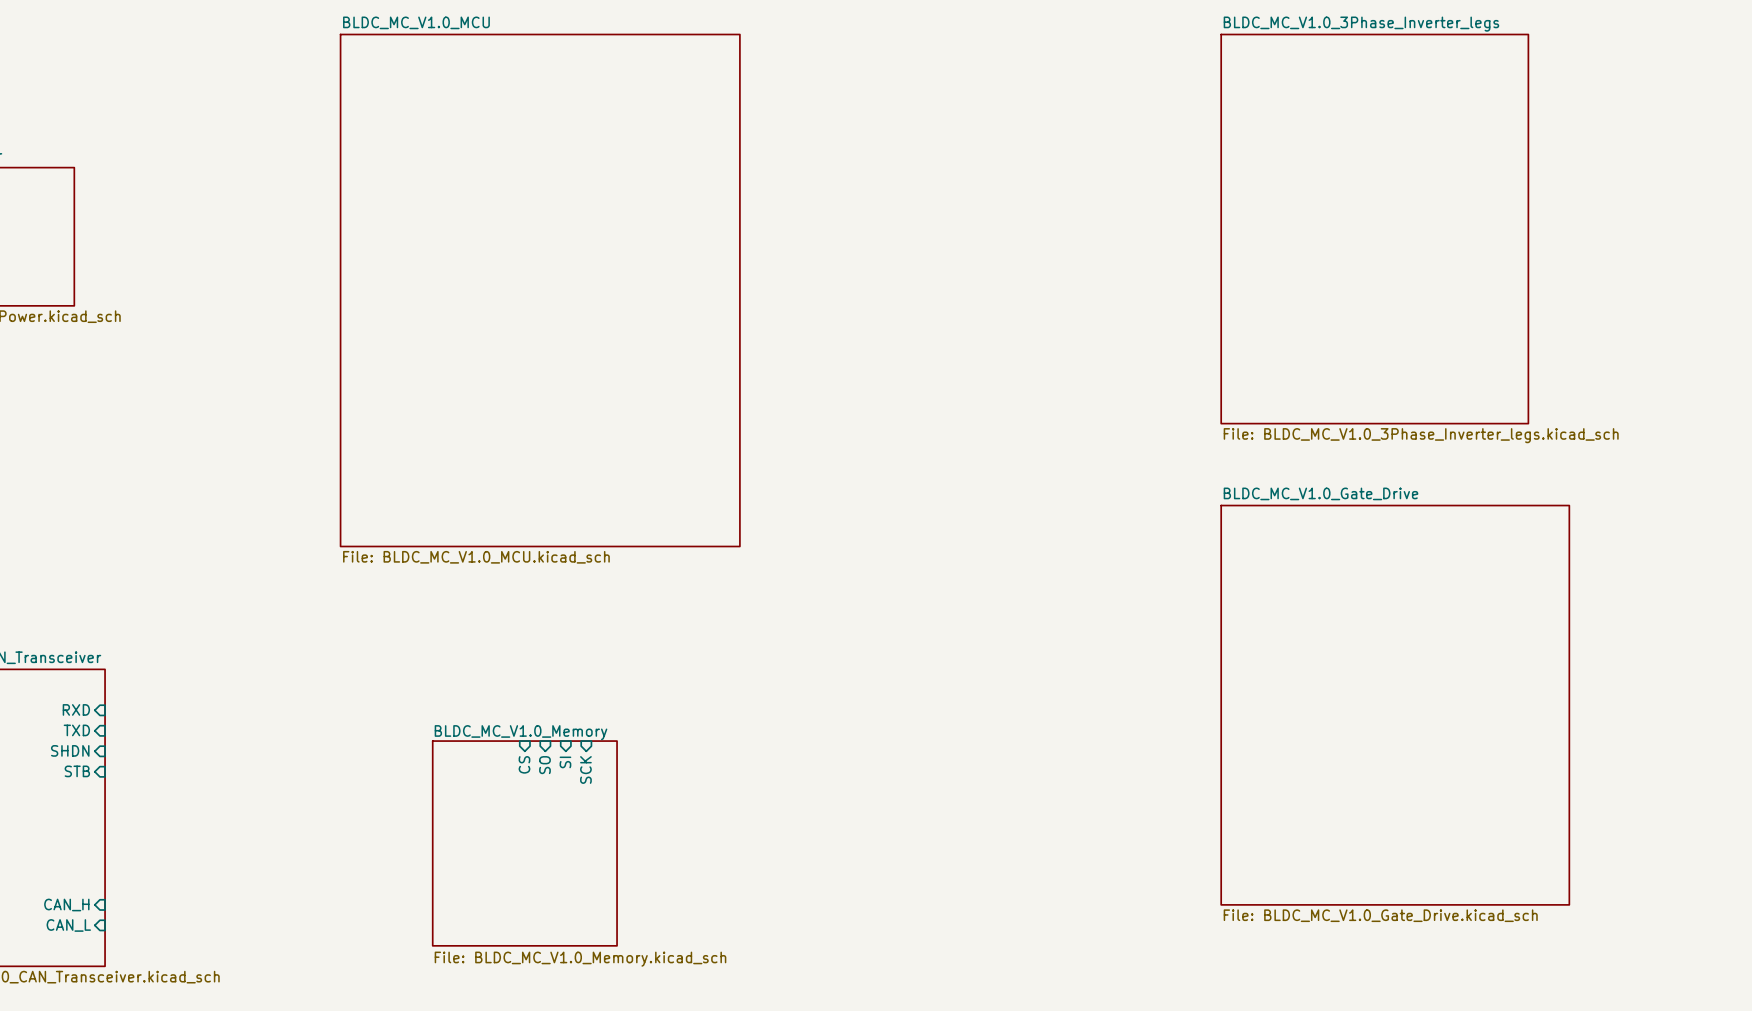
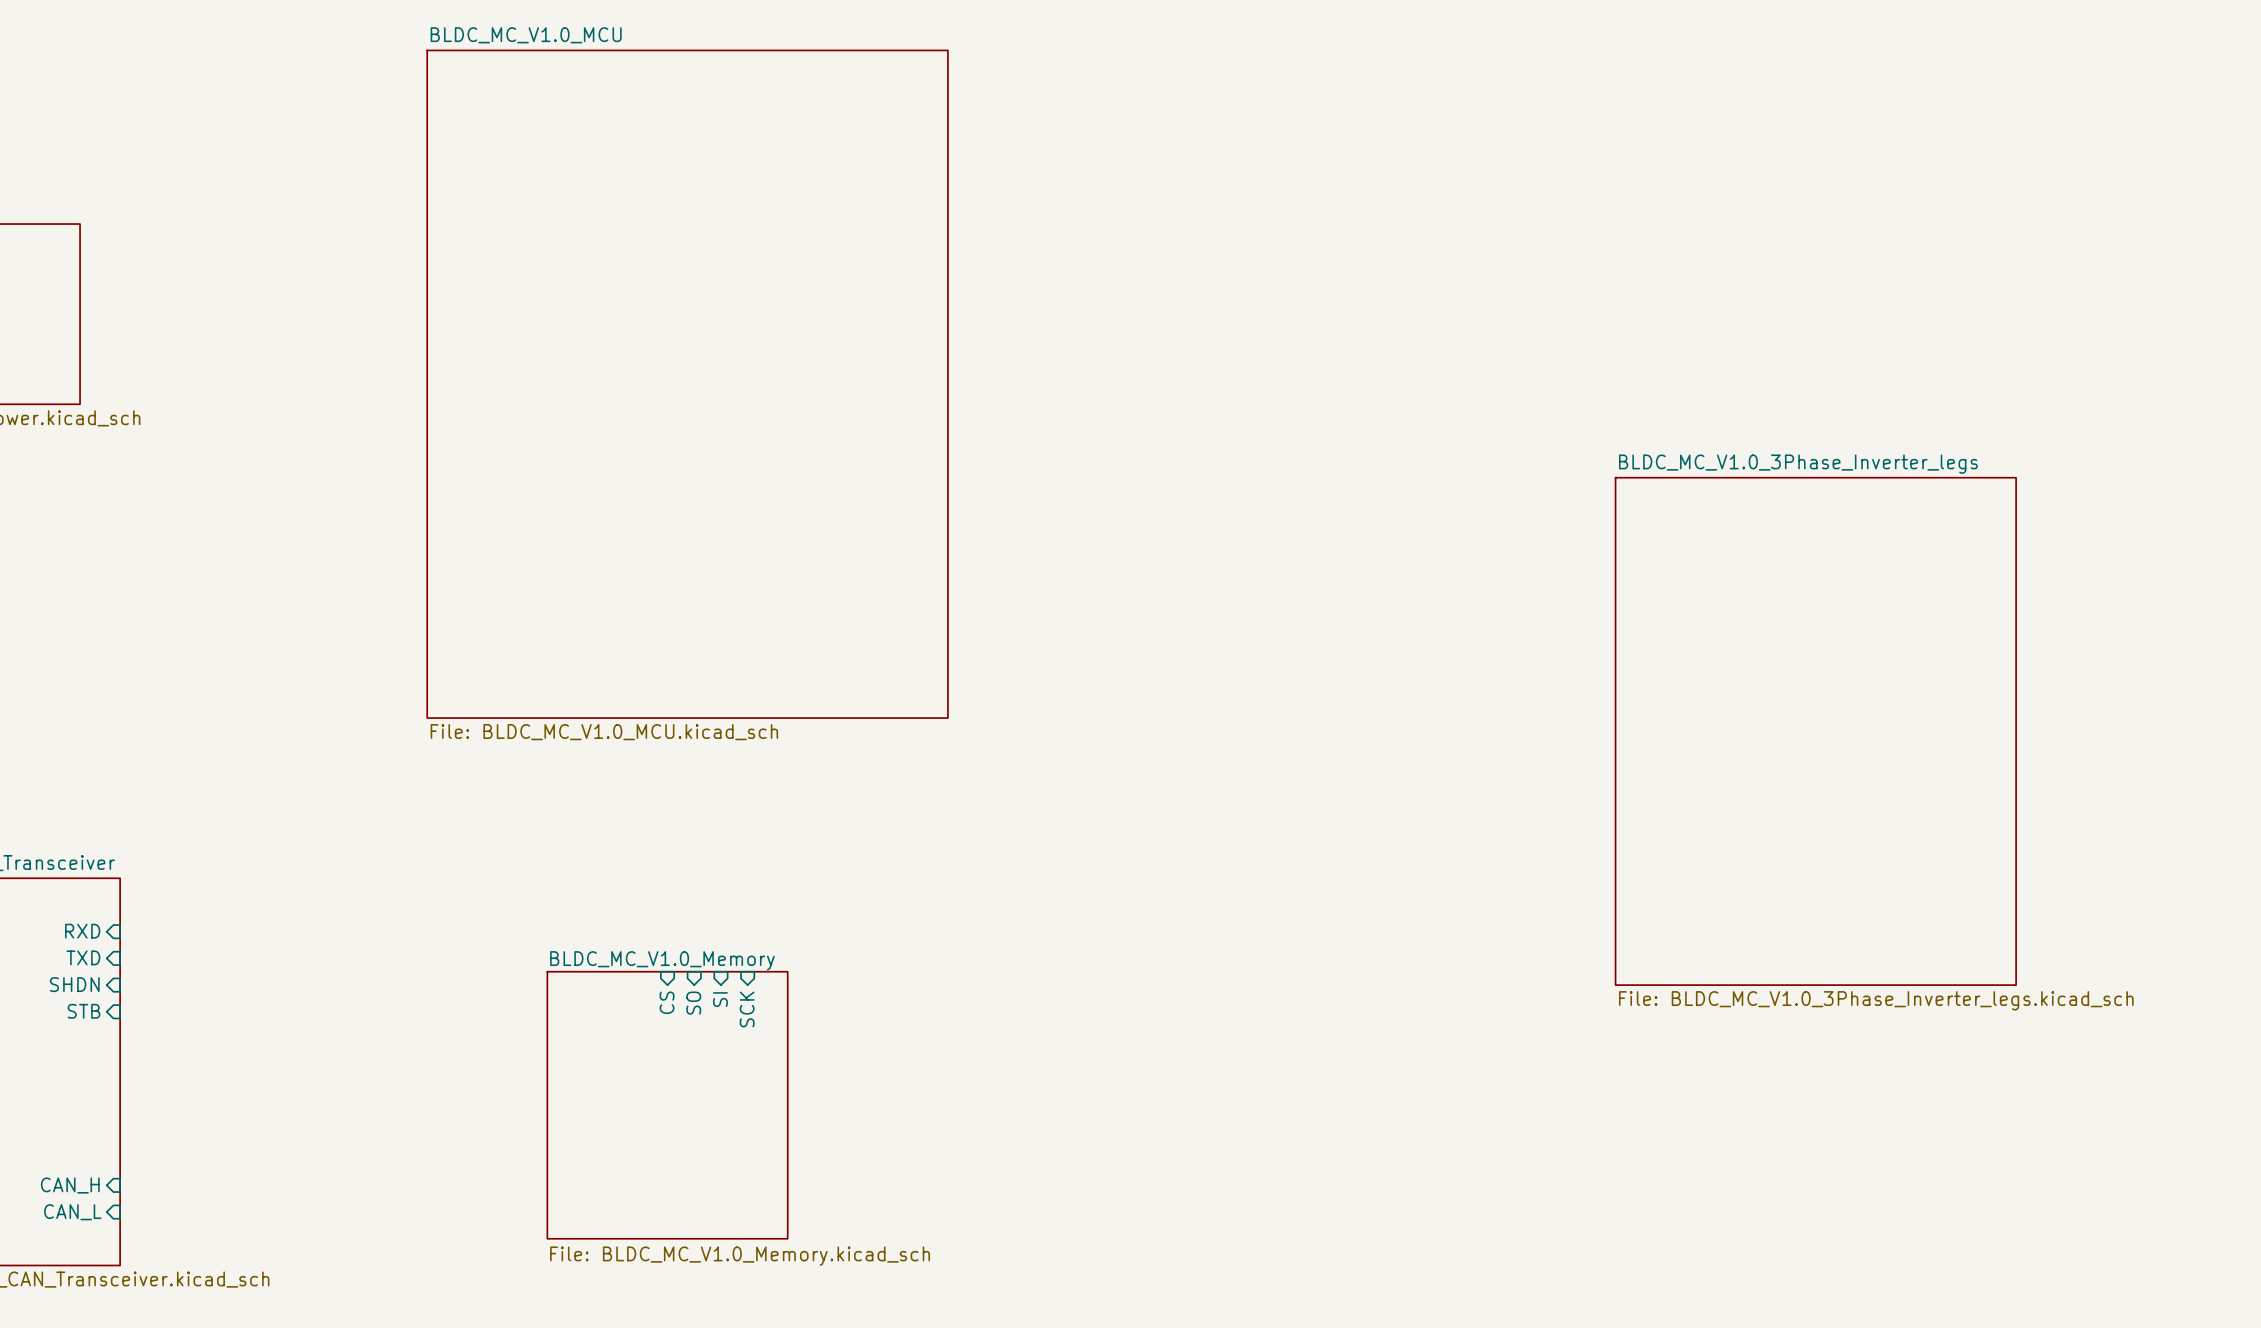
sheet BLDC_MC_V1.0_3Phase_Inverter_legs position: (1374, 229) -> (1815, 731)
sheet BLDC_MC_V1.0_Gate_Drive: File: BLDC_MC_V1.0_Gate_Drive.kicad_sch (1395, 705) -> none

